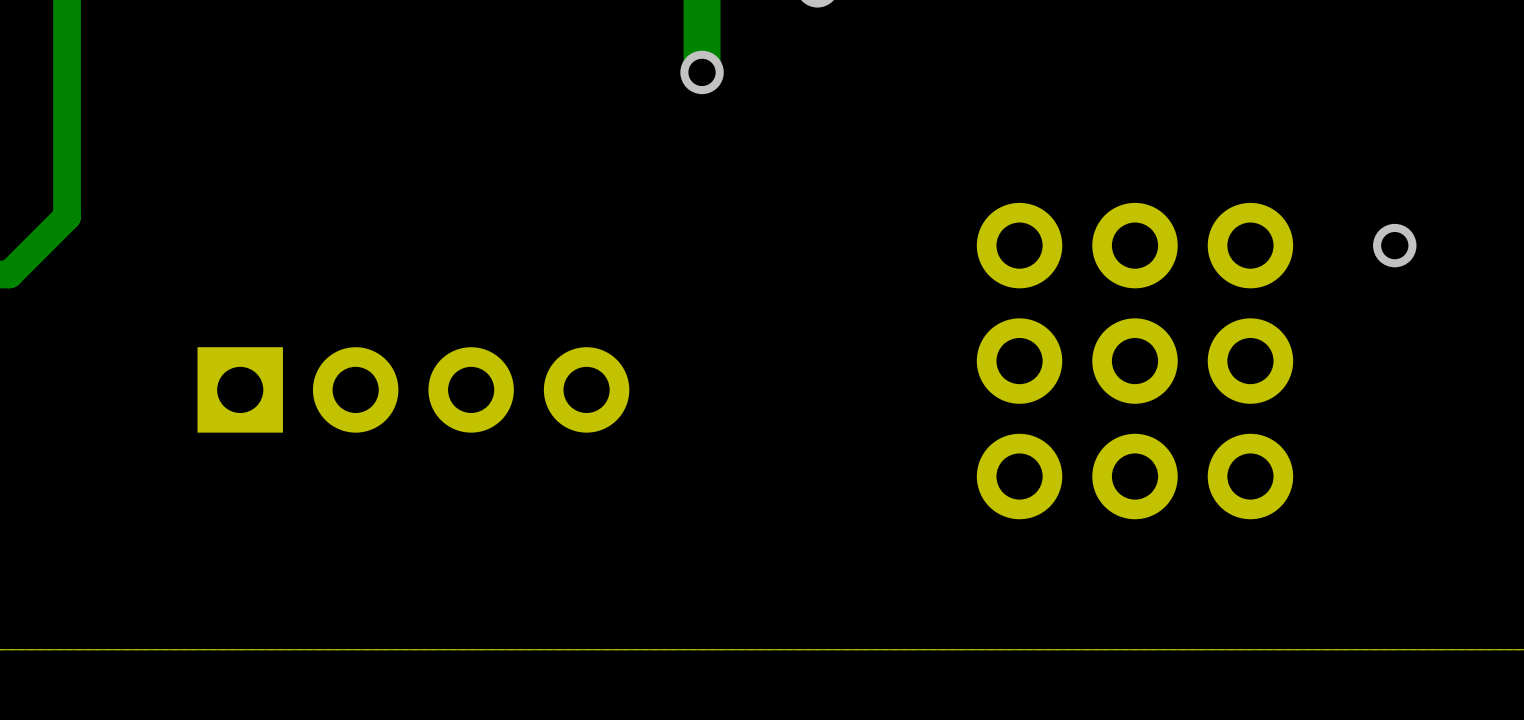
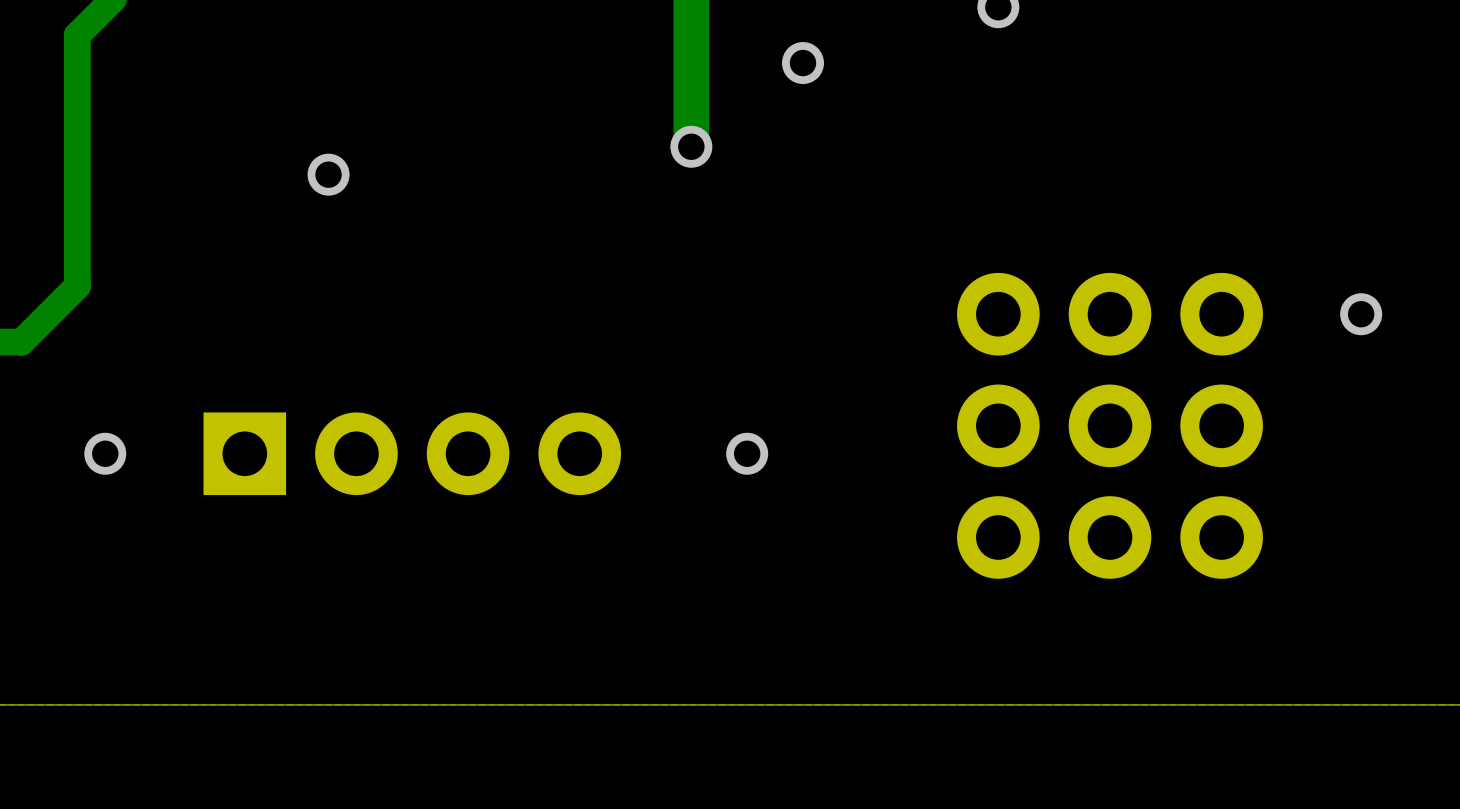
via: none -> (328, 174)
via: none -> (105, 453)
via: none -> (747, 453)

